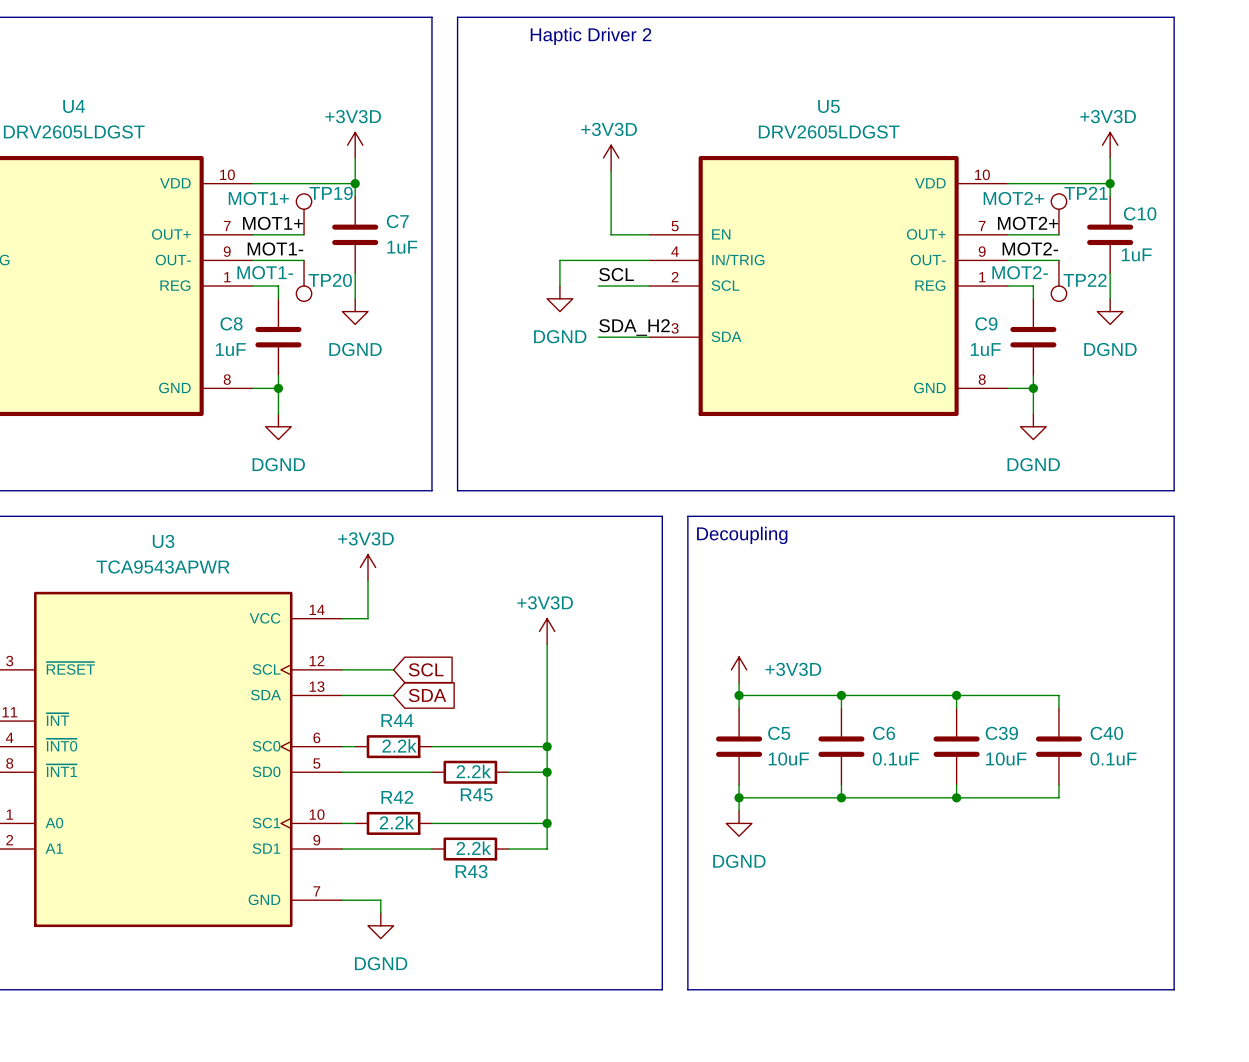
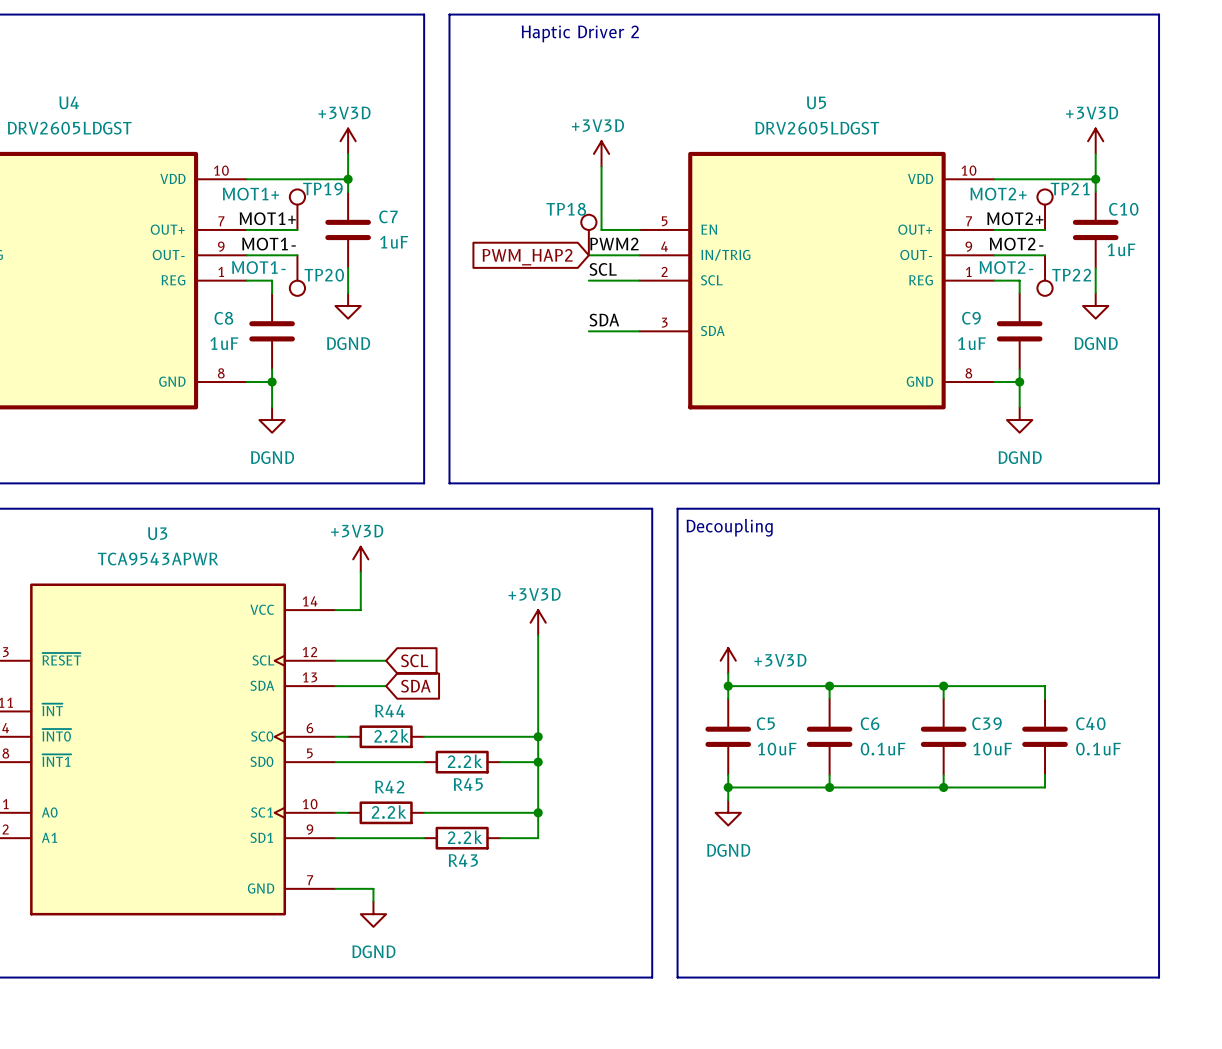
TP18: none -> (588, 235)
label: none -> PWM2 (614, 243)
wire: (598, 260) (559, 260) (559, 286) -> none
global label: none -> PWM_HAP2 (527, 257)
power symbol: DGND (559, 298) -> none
label: SDA_H2 (634, 327) -> SDA (604, 320)

